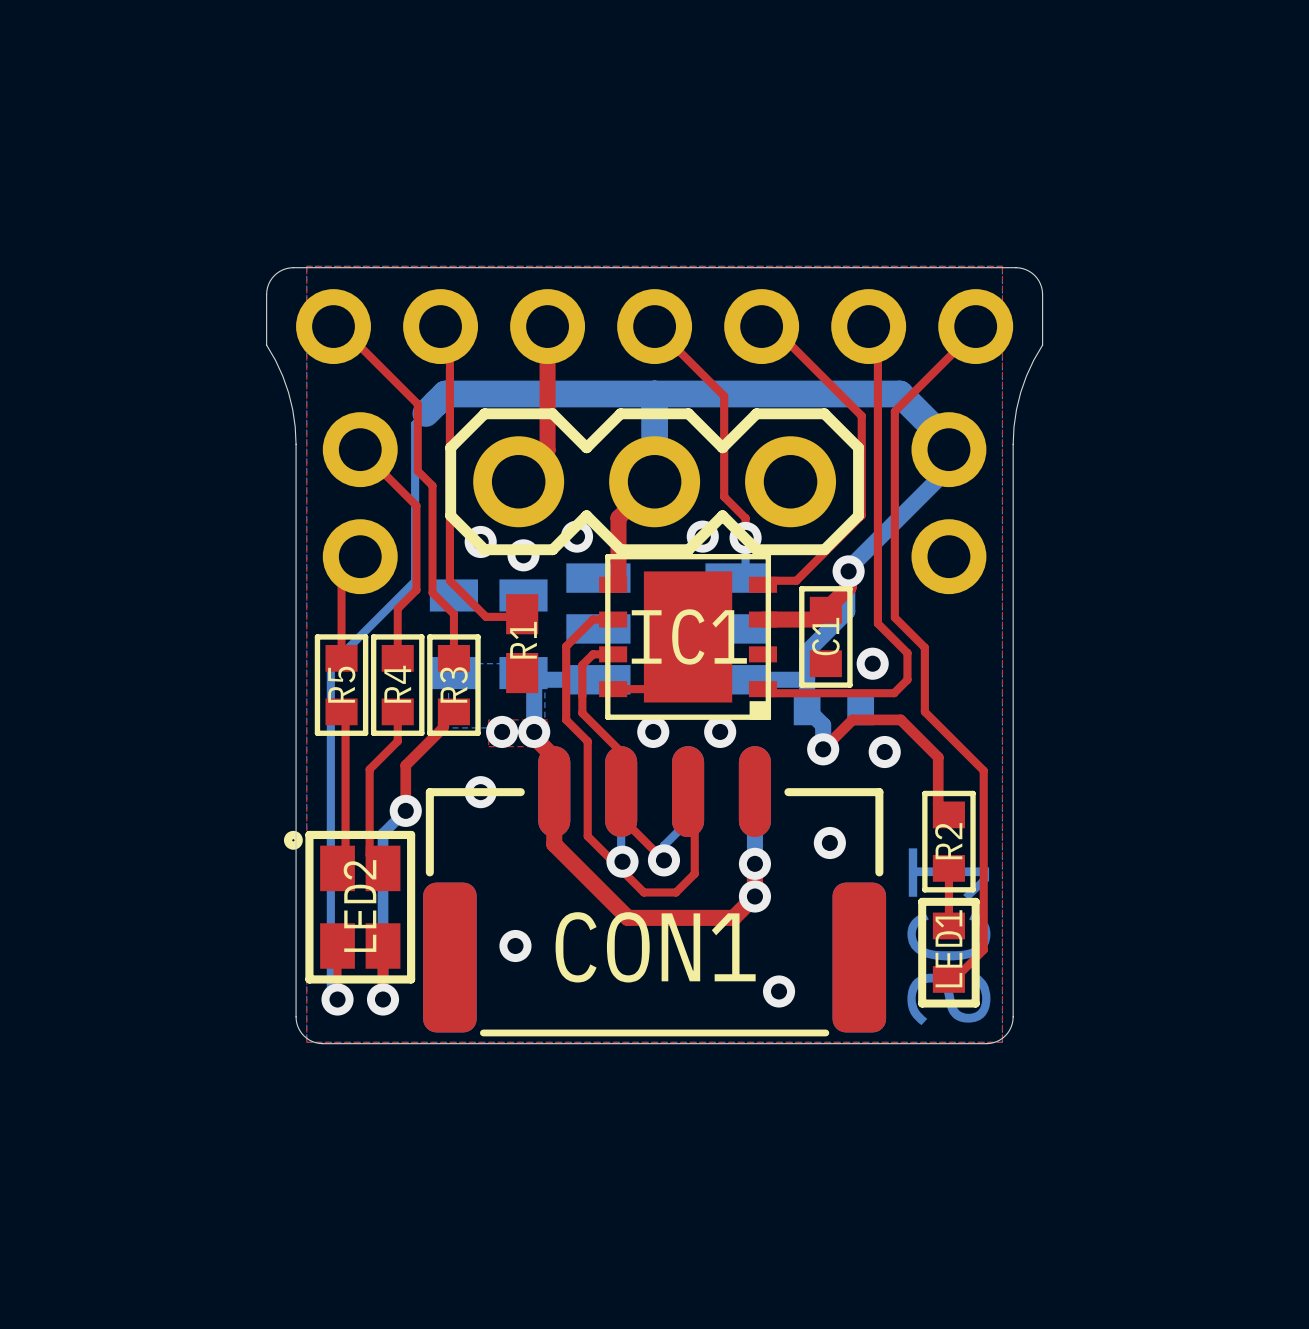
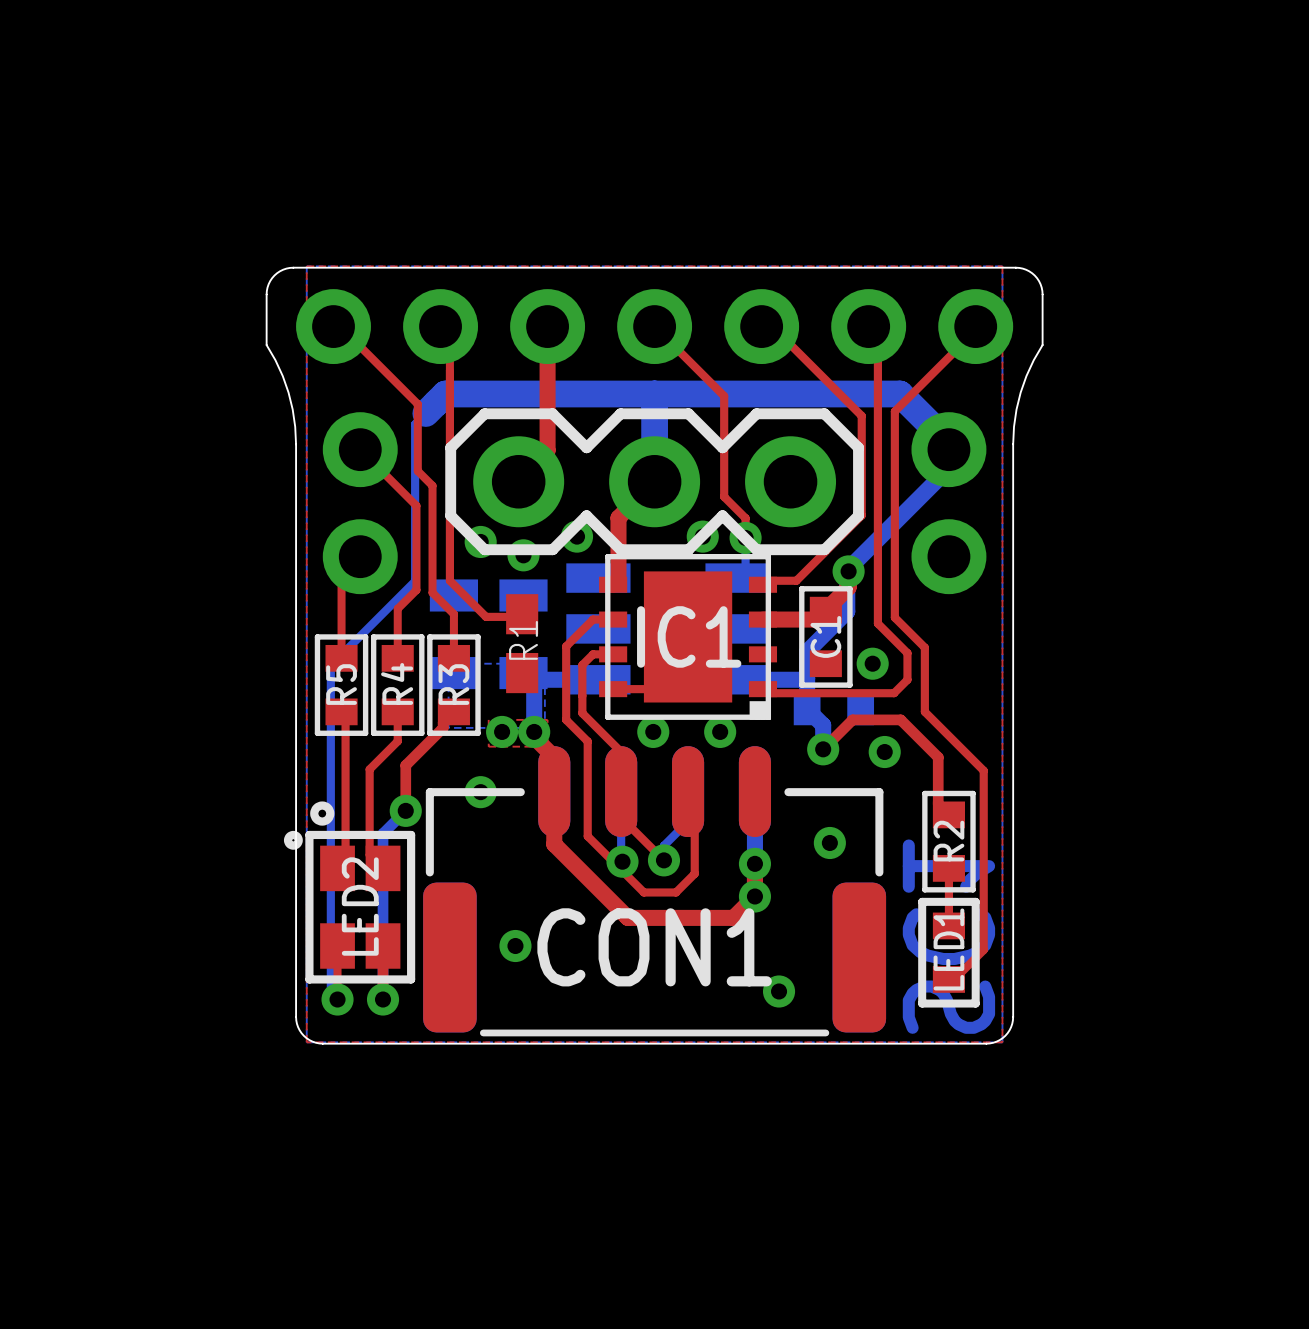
drawing: none -> [310, 801, 335, 826]

